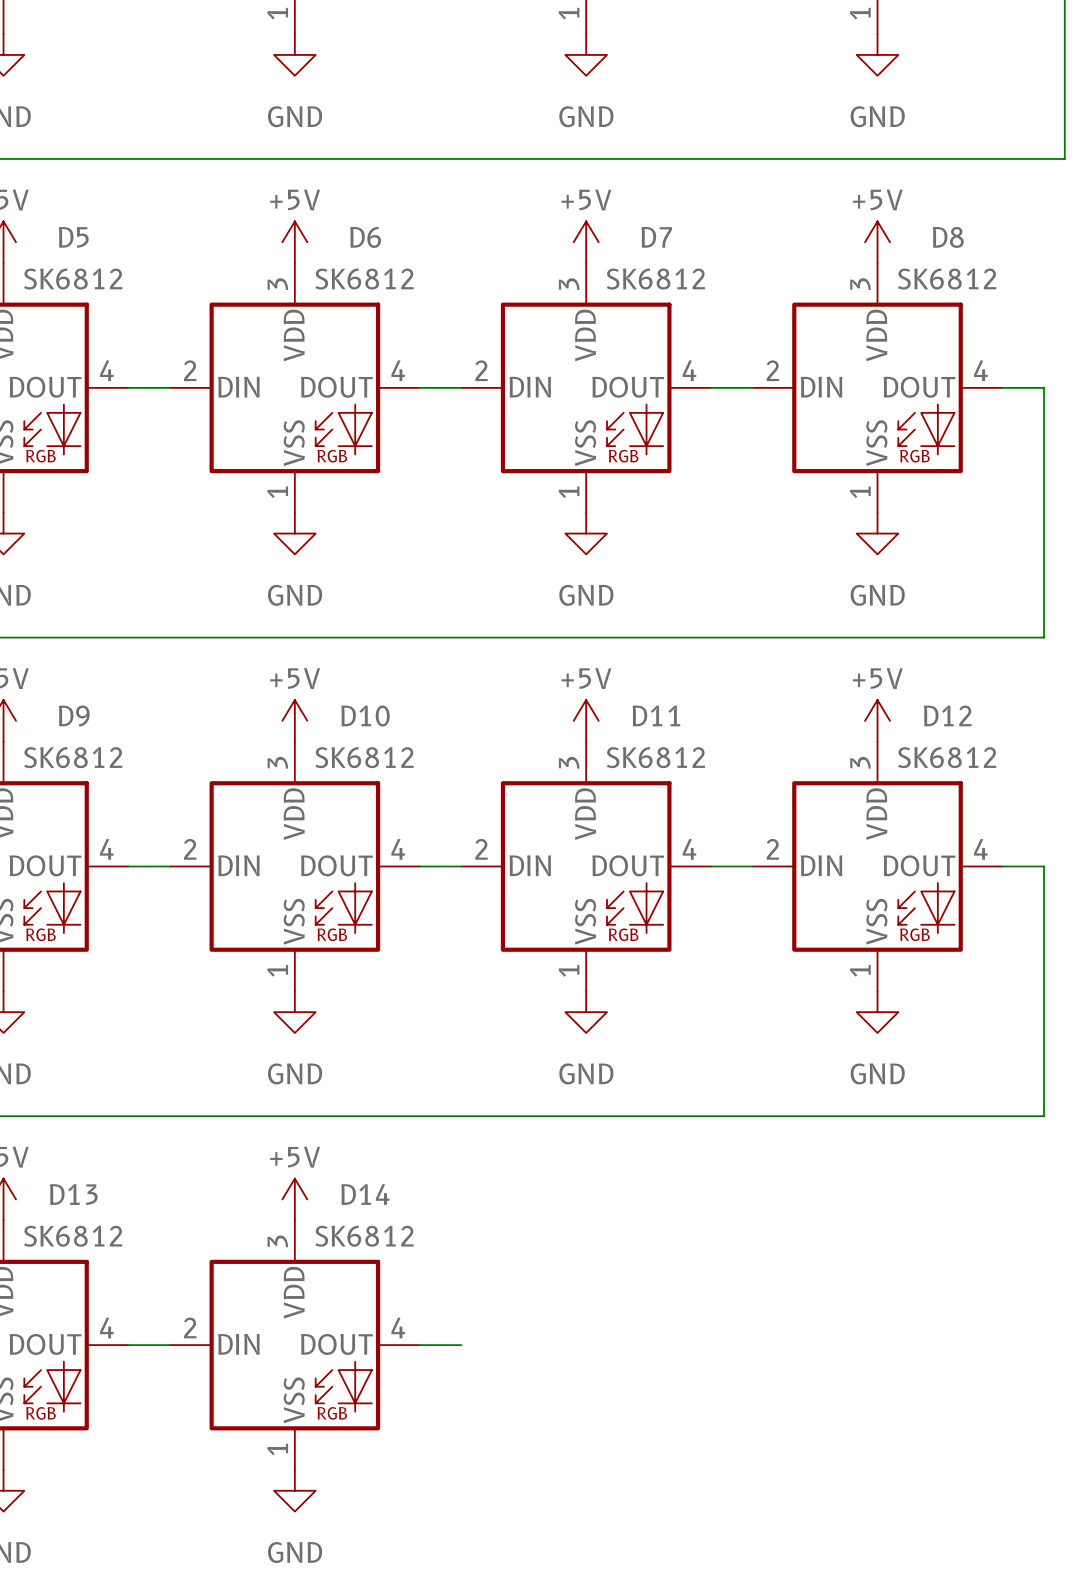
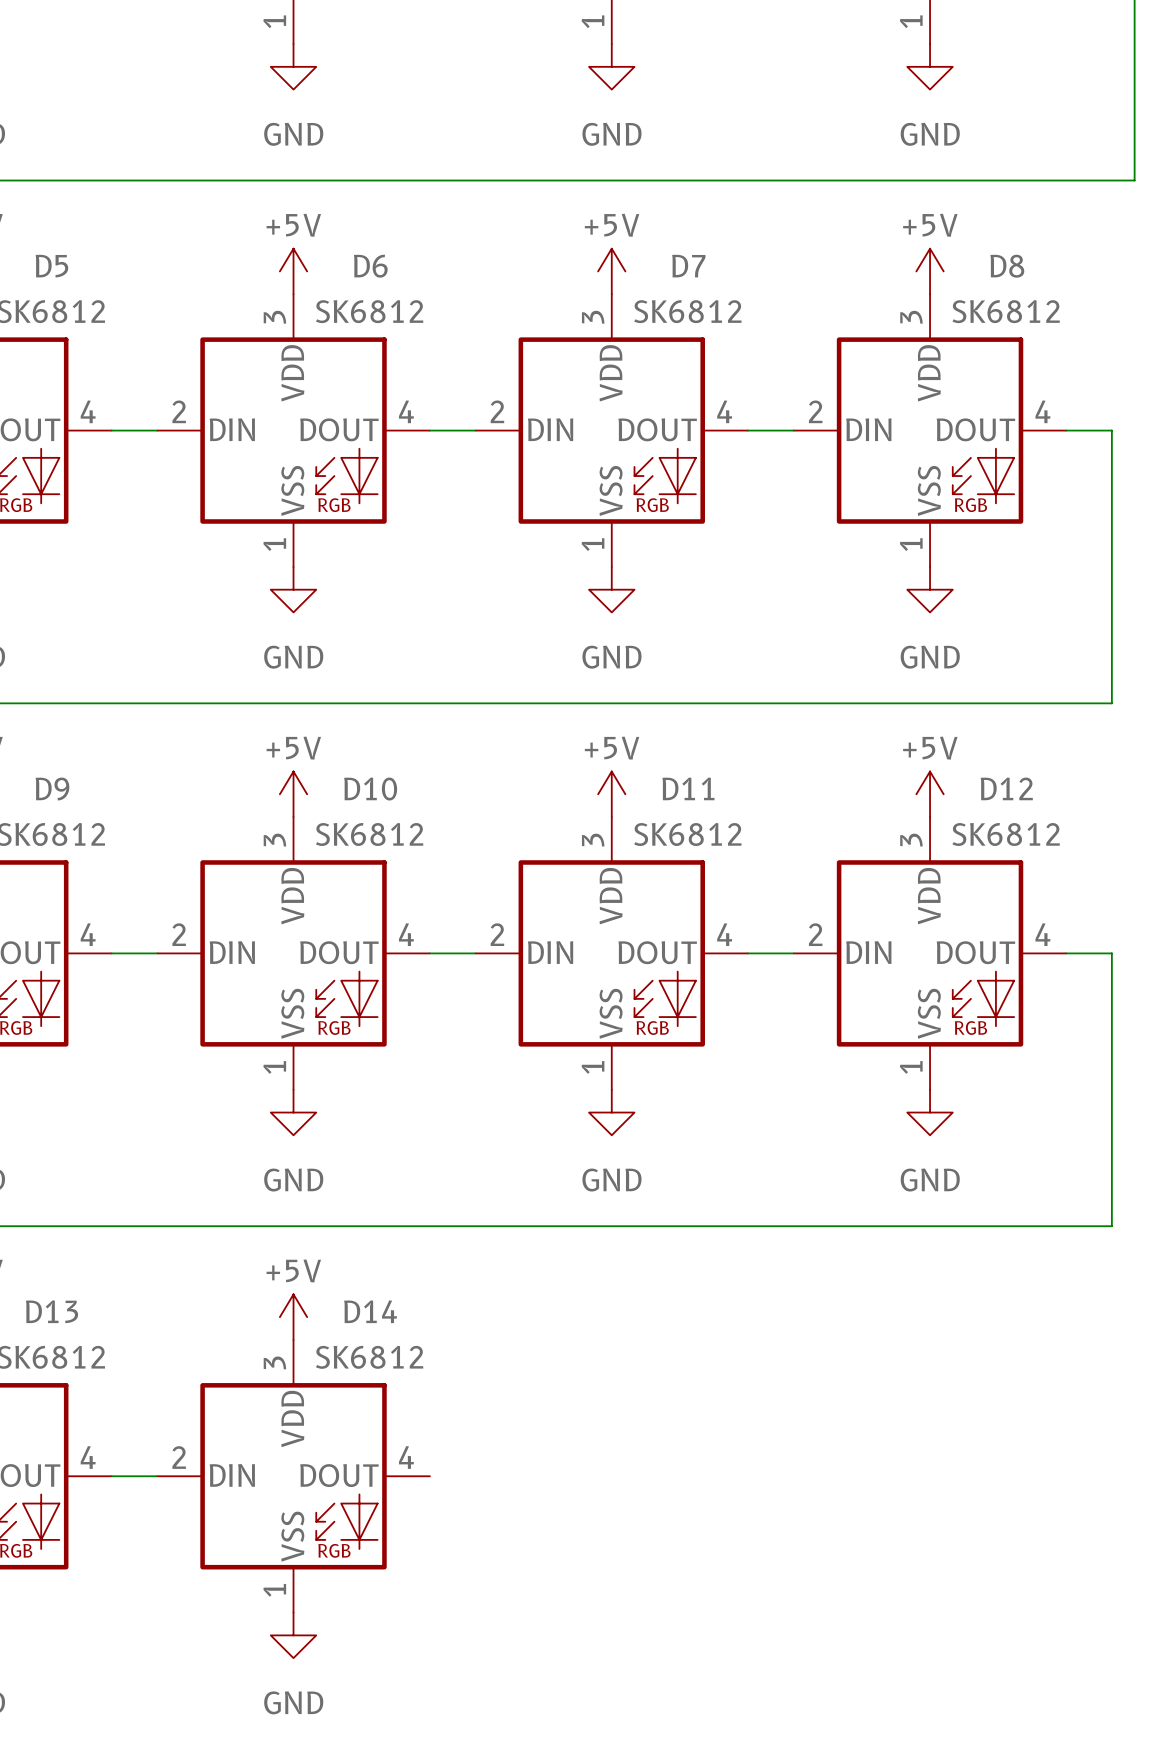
wire: (419, 1345) (461, 1345) -> none

